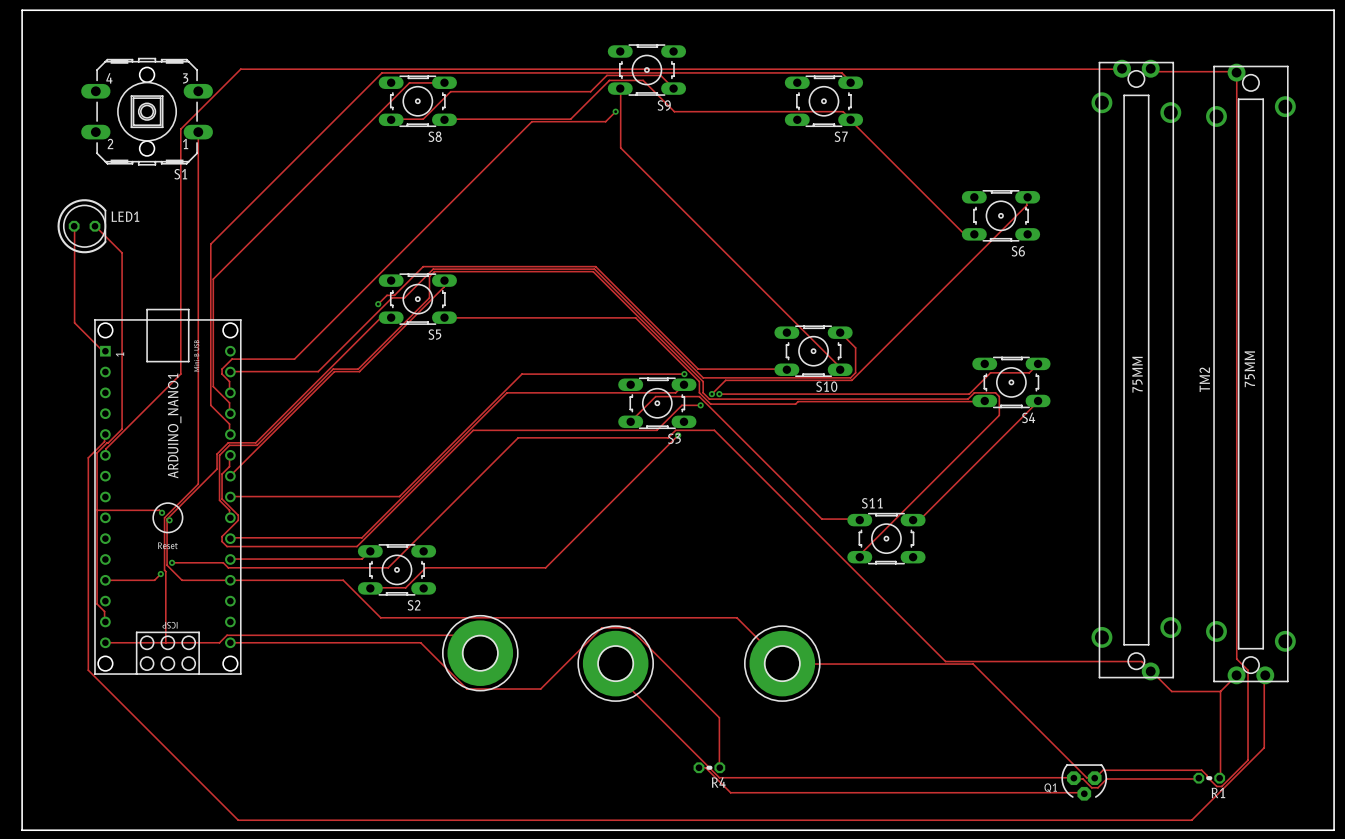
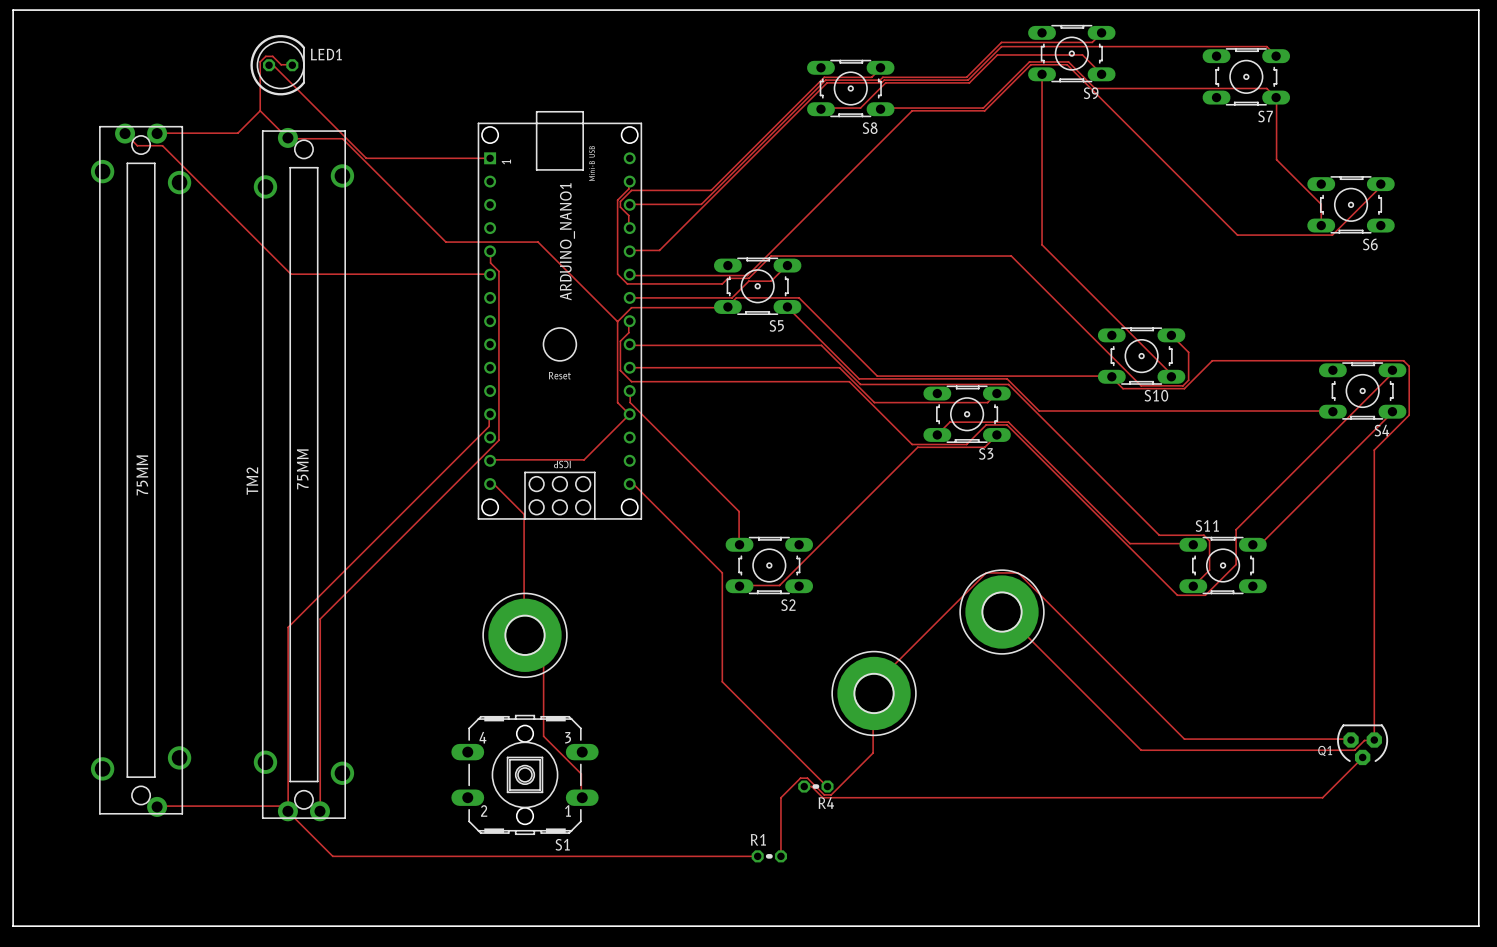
track: none -> (269, 65) (274, 66) (366, 158) (490, 158)
track: none -> (292, 65) (281, 64) (272, 56) (265, 56) (260, 61) (260, 110)
track: none -> (880, 67) (871, 77) (824, 77) (711, 190) (631, 190) (620, 201) (620, 207) (628, 215) (629, 228)
track: none -> (1042, 74) (1042, 244) (1170, 373) (1171, 376)
track: none -> (1101, 74) (1082, 54) (997, 54) (969, 82) (885, 82) (860, 108) (820, 109)
track: (1122, 68) (240, 69) (180, 129) (180, 374) (105, 449) (105, 455) -> none
track: (1150, 68) (1154, 71) (1236, 72) (1236, 659) (1248, 670) (1248, 760) (1221, 786) (1216, 786) (1201, 770) (1103, 770) (1094, 778) (1086, 777) (973, 664) (783, 664) (736, 617) (380, 617) (343, 580) (182, 580) (167, 565) (167, 519) (217, 469) (217, 454) (228, 442) (255, 442) (380, 317) (391, 317) -> none
S9 position: (646, 70) -> (1071, 53)
track: (749, 72) (382, 72) (210, 244) (210, 405) (229, 424) (230, 434) -> (825, 80) (701, 204) (629, 204)
track: (798, 72) (801, 72) -> (880, 80) (882, 77) (966, 77) (1001, 42) (1092, 42) (1101, 32)
track: none -> (884, 80) (881, 82) (827, 82) (659, 250) (629, 251)
track: (841, 72) (850, 82) -> (928, 80) (968, 80) (1001, 46) (1266, 46) (1276, 56)
track: (444, 82) (409, 82) (213, 279) (213, 386) (229, 402) (230, 413) -> none
track: (620, 88) (620, 147) (839, 366) (840, 369) -> none
track: (673, 88) (660, 75) (606, 75) (590, 91) (450, 91) (423, 119) (391, 119) -> none
track: none -> (880, 109) (983, 108) (1029, 61) (1068, 61) (1095, 88) (1266, 88) (1276, 98) (1276, 159) (1321, 204) (1321, 225)
track: none -> (260, 110) (288, 138) (342, 138) (445, 242) (538, 242) (617, 321)
track: none -> (260, 110) (237, 133) (157, 133)
S8 position: (417, 101) -> (850, 88)
S7 position: (823, 101) -> (1246, 76)
S1 position: (147, 111) -> (525, 774)
track: (615, 111) (605, 121) (531, 121) (294, 359) (232, 359) (222, 369) (222, 374) (229, 381) (230, 392) -> none
via: (615, 111) -> none
track: (444, 119) (570, 119) (609, 80) (643, 80) (674, 111) (843, 111) (964, 234) (974, 234) -> none
track: none -> (125, 133) (137, 145) (162, 145) (290, 274) (490, 274)
track: (198, 132) (198, 484) (164, 517) (165, 642) -> none
track: none -> (629, 181) (628, 189) (617, 200) (617, 274) (627, 283) (722, 283) (727, 278) (748, 278) (771, 256) (1011, 256) (1141, 385) (1183, 385) (1188, 380) (1188, 352) (1171, 335)
track: none -> (1380, 184) (1379, 187) (1332, 235) (1237, 235) (1067, 64) (1030, 64) (984, 110) (912, 110) (747, 275) (629, 274)
track: (1027, 197) (1026, 205) (851, 380) (725, 380) (711, 394) -> none
S6 position: (1000, 215) -> (1351, 204)
track: (74, 226) (74, 322) (102, 350) (105, 351) -> none
LED1 position: (81, 226) -> (277, 65)
track: (94, 226) (122, 252) (122, 429) (97, 452) (97, 604) (104, 611) (105, 621) -> none
track: none -> (490, 251) (490, 263) (498, 271) (498, 440) (320, 619) (319, 811)
track: none -> (787, 265) (771, 281) (748, 281) (732, 297) (629, 297)
track: none -> (787, 306) (859, 378) (1007, 378) (1039, 410) (1332, 411)
track: (444, 280) (444, 286) (359, 371) (334, 371) (230, 476) -> none
track: none -> (617, 321) (631, 307) (727, 307) (736, 297) (799, 297) (877, 376) (1111, 376) (1123, 388) (1184, 388) (1212, 360) (1403, 360) (1409, 366) (1409, 415) (1374, 450) (1374, 740) (1364, 740) (1354, 750) (1141, 750) (1002, 612)
track: none -> (617, 321) (617, 402) (629, 414) (584, 459) (490, 460)
S5 position: (417, 299) -> (757, 286)
track: (378, 304) (387, 295) (394, 295) (423, 266) (595, 266) (698, 369) (786, 369) -> none
via: (378, 304) -> none
track: none -> (629, 344) (821, 345) (860, 384) (1008, 384) (1159, 535) (1203, 535) (1209, 540) (1209, 570) (1193, 586)
track: (444, 317) (635, 317) (699, 381) (699, 392) (710, 404) (795, 404) (798, 401) (831, 401) -> (739, 586) (779, 585) (917, 447)
track: none -> (629, 367) (839, 367) (874, 402) (987, 402) (996, 393)
track: (840, 332) (855, 347) (855, 372) (850, 377) (703, 377) (594, 269) (433, 269) (404, 297) (391, 297) (318, 371) (230, 372) -> none
track: none -> (629, 390) (630, 402) (739, 511) (739, 544)
S10 position: (813, 351) -> (1141, 356)
track: (1038, 363) (1029, 372) (990, 372) (969, 394) (719, 394) -> none
track: none -> (1392, 411) (1261, 543) (1252, 544)
part: (1136, 370) -> none
track: none -> (490, 414) (489, 426) (288, 627) (287, 811)
TM2 position: (1250, 373) -> (303, 474)
track: (684, 374) (521, 374) (399, 496) (230, 496) -> none
via: (684, 374) -> none
S4 position: (1011, 382) -> (1362, 390)
track: (684, 384) (675, 392) (506, 392) (362, 537) (230, 538) -> none
track: none -> (937, 434) (949, 422) (1008, 422) (1129, 543) (1193, 544)
via: (711, 394) -> none
via: (719, 394) -> none
track: (826, 399) (709, 399) (703, 392) (703, 381) (593, 271) (434, 271) (429, 276) (429, 297) (358, 369) (333, 369) (257, 445) (229, 445) (219, 455) (219, 500) (229, 510) (230, 517) -> (912, 444) (849, 381) (631, 381) (620, 370) (620, 341) (628, 332) (629, 321)
track: (875, 399) (968, 399) (974, 392) (995, 392) (999, 396) (999, 415) (860, 554) (859, 557) -> (966, 444) (986, 424) (1007, 424) (1177, 595) (1205, 595) (1236, 564) (1236, 529) (1392, 373) (1392, 370)
track: (984, 400) (891, 401) -> (996, 434) (984, 447)
track: (1038, 400) (920, 519) (913, 520) -> none
S3 position: (657, 403) -> (967, 414)
track: (700, 405) (681, 405) (656, 430) (473, 430) (357, 546) (227, 546) (222, 541) (222, 536) (238, 520) (238, 515) (222, 499) (222, 474) (229, 466) (230, 455) -> none
via: (700, 405) -> none
track: (630, 421) (655, 396) (699, 396) (821, 519) (859, 520) -> none
part: none -> (141, 470)
track: (105, 434) (104, 441) (88, 457) (88, 670) (238, 820) (1191, 820) (1264, 747) (1265, 675) -> none
track: none -> (490, 484) (494, 484) (524, 514) (524, 634) (543, 653) (543, 736) (581, 773) (582, 797)
track: none -> (629, 484) (634, 484) (722, 572) (722, 681) (827, 786)
track: (678, 435) (545, 567) (425, 567) (405, 587) (370, 588) -> none
via: (678, 435) -> none
ARDUINO_NANO1 position: (167, 491) -> (559, 315)
track: (97, 510) (159, 510) (162, 512) -> none
via: (162, 512) -> none
via: (169, 520) -> none
S11 position: (886, 538) -> (1223, 565)
part: none -> (1002, 612)
track: (370, 551) (362, 559) (230, 559) -> none
track: (172, 562) (223, 562) (228, 567) (388, 567) (518, 437) (668, 437) (675, 430) (714, 430) (945, 661) (1141, 661) (1171, 691) (1220, 691) -> none
via: (172, 562) -> none
S2 position: (396, 569) -> (769, 565)
part: none -> (525, 635)
track: (160, 574) (154, 580) (105, 580) -> none
via: (160, 574) -> none
track: (105, 642) (219, 642) (227, 635) (461, 635) (480, 653) -> none
track: (230, 642) (420, 642) (466, 689) (540, 689) (601, 627) (629, 627) (719, 717) (719, 767) -> none
part: (480, 653) -> none
track: (615, 663) (615, 674) (719, 777) (1073, 777) (1083, 778) (1091, 787) (1098, 787) (1106, 778) (1198, 778) -> none
part: (615, 663) -> none
part position: (782, 663) -> (874, 693)
track: none -> (1351, 740) (1184, 739) (1018, 572) (986, 572) (874, 684) (873, 753) (831, 794) (824, 794) (807, 778) (800, 778) (780, 797) (780, 856)
track: (1236, 675) (1220, 691) -> none
track: none -> (1362, 757) (1322, 797) (822, 797) (811, 786) (804, 786)
track: (1220, 691) (1219, 778) -> none
track: none -> (157, 806) (288, 806) (287, 811)
track: none -> (287, 811) (332, 856) (757, 856)
track: (698, 767) (705, 767) (730, 792) (1084, 793) -> none
R4 position: (709, 767) -> (815, 786)
R1 position: (1209, 778) -> (769, 856)
Q1 position: (1084, 782) -> (1362, 744)
R1 name position: R1 (1218, 792) -> R1 (758, 839)

